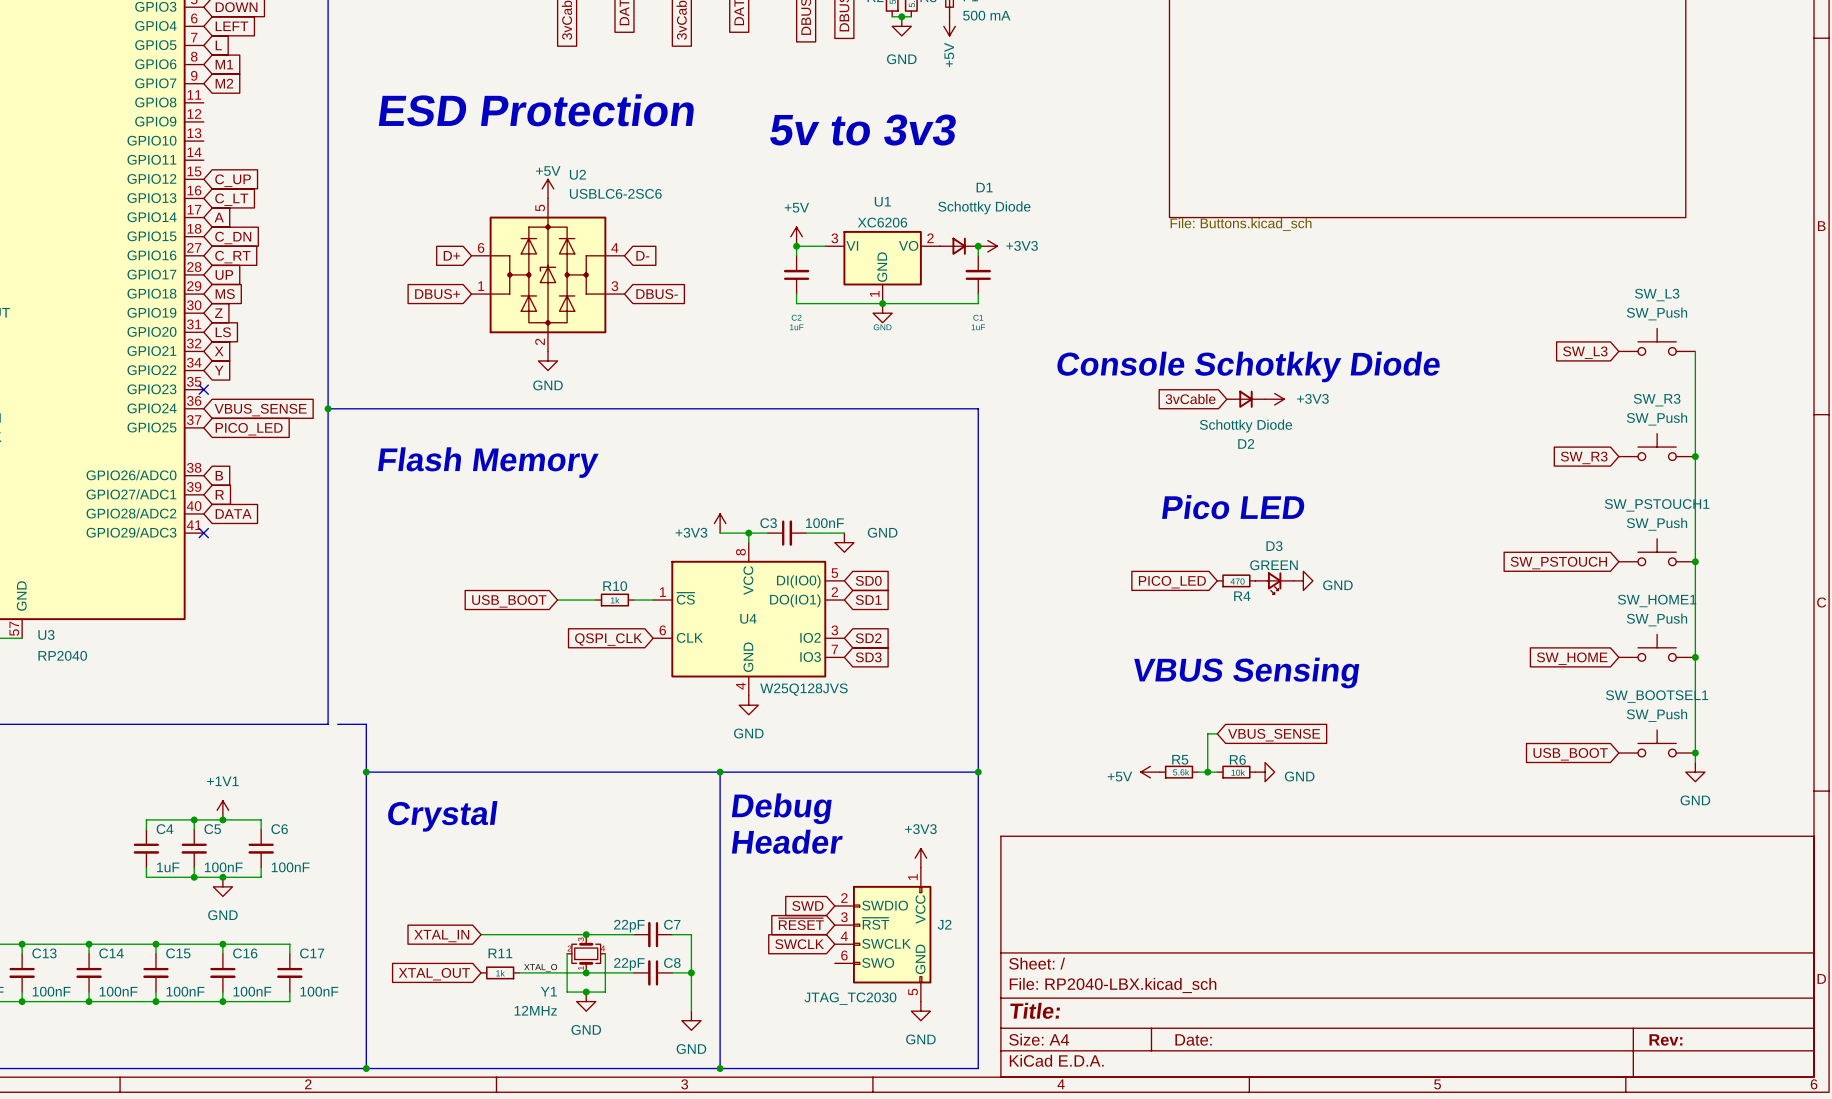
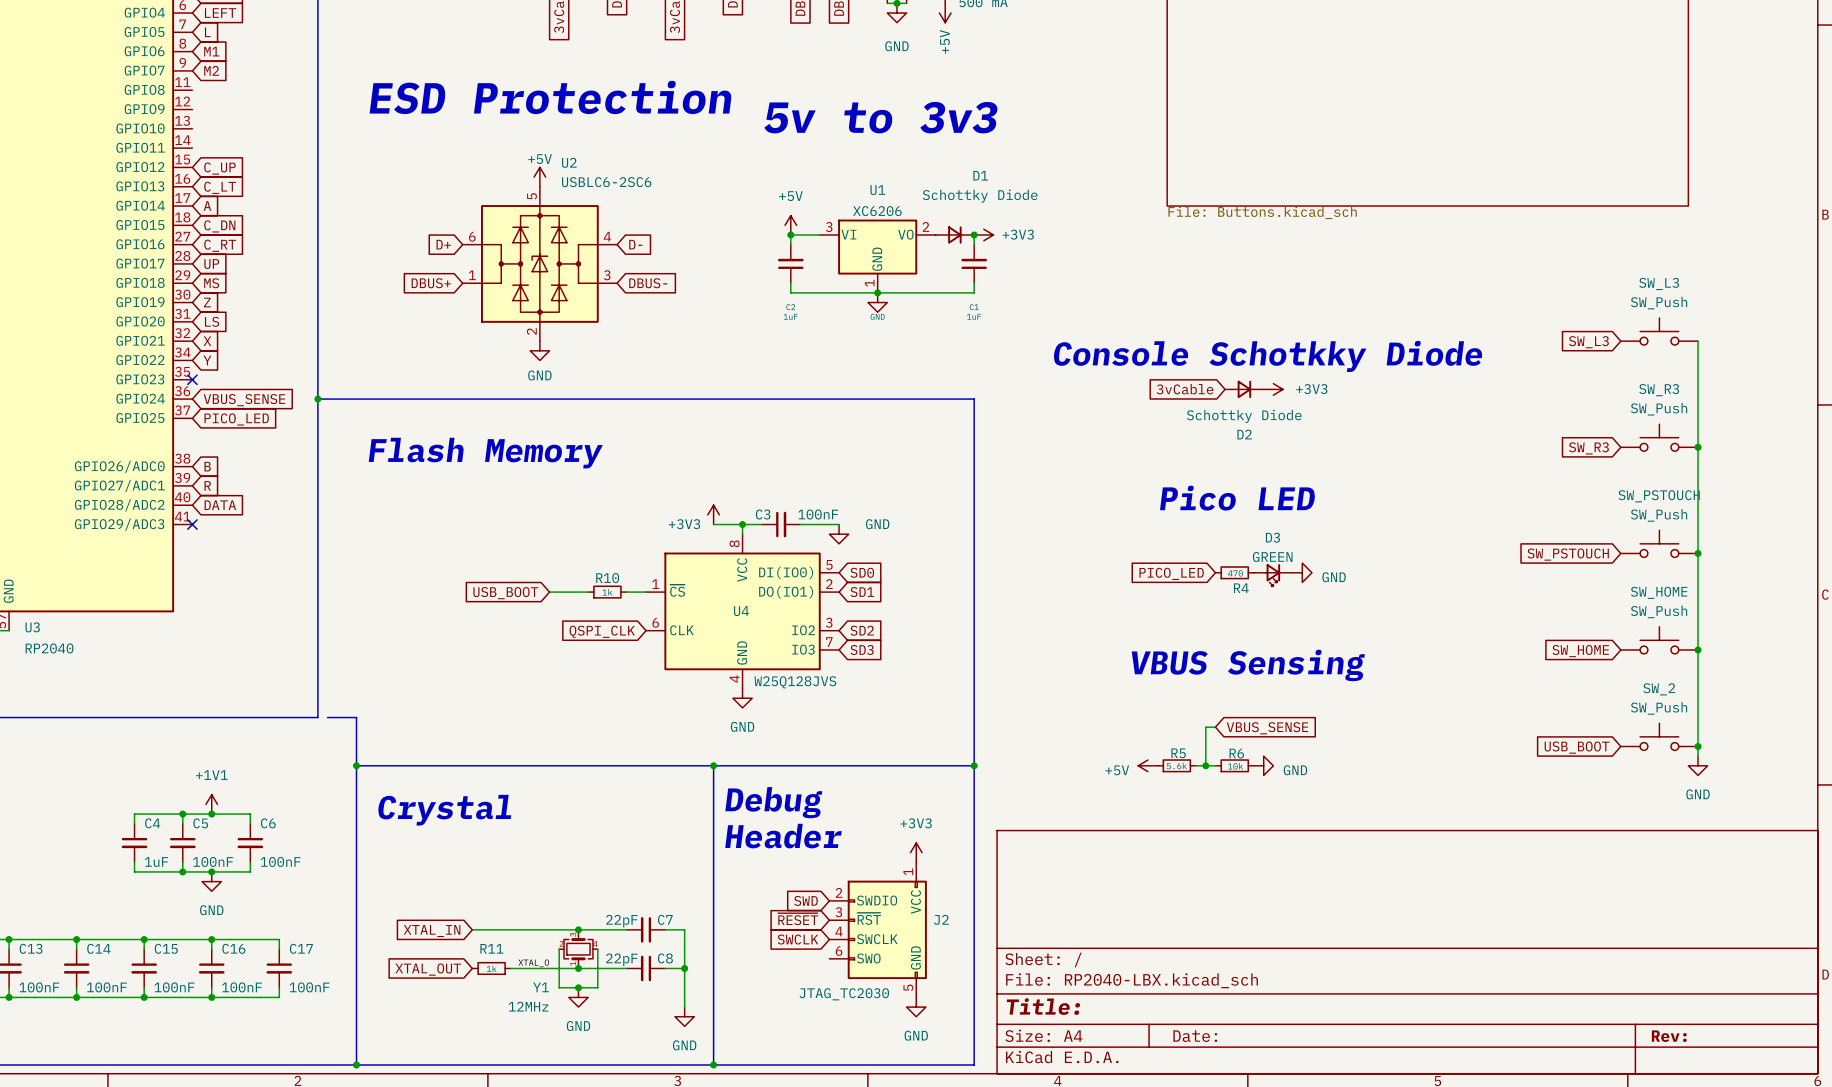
SW_PSTOUCH1 name: SW_PSTOUCH1 (1657, 505) -> SW_PSTOUCH (1659, 496)
SW_HOME1 name: SW_HOME1 (1657, 600) -> SW_HOME (1659, 592)
SW_BOOTSEL1 name: SW_BOOTSEL1 (1657, 696) -> SW_2 (1659, 689)

